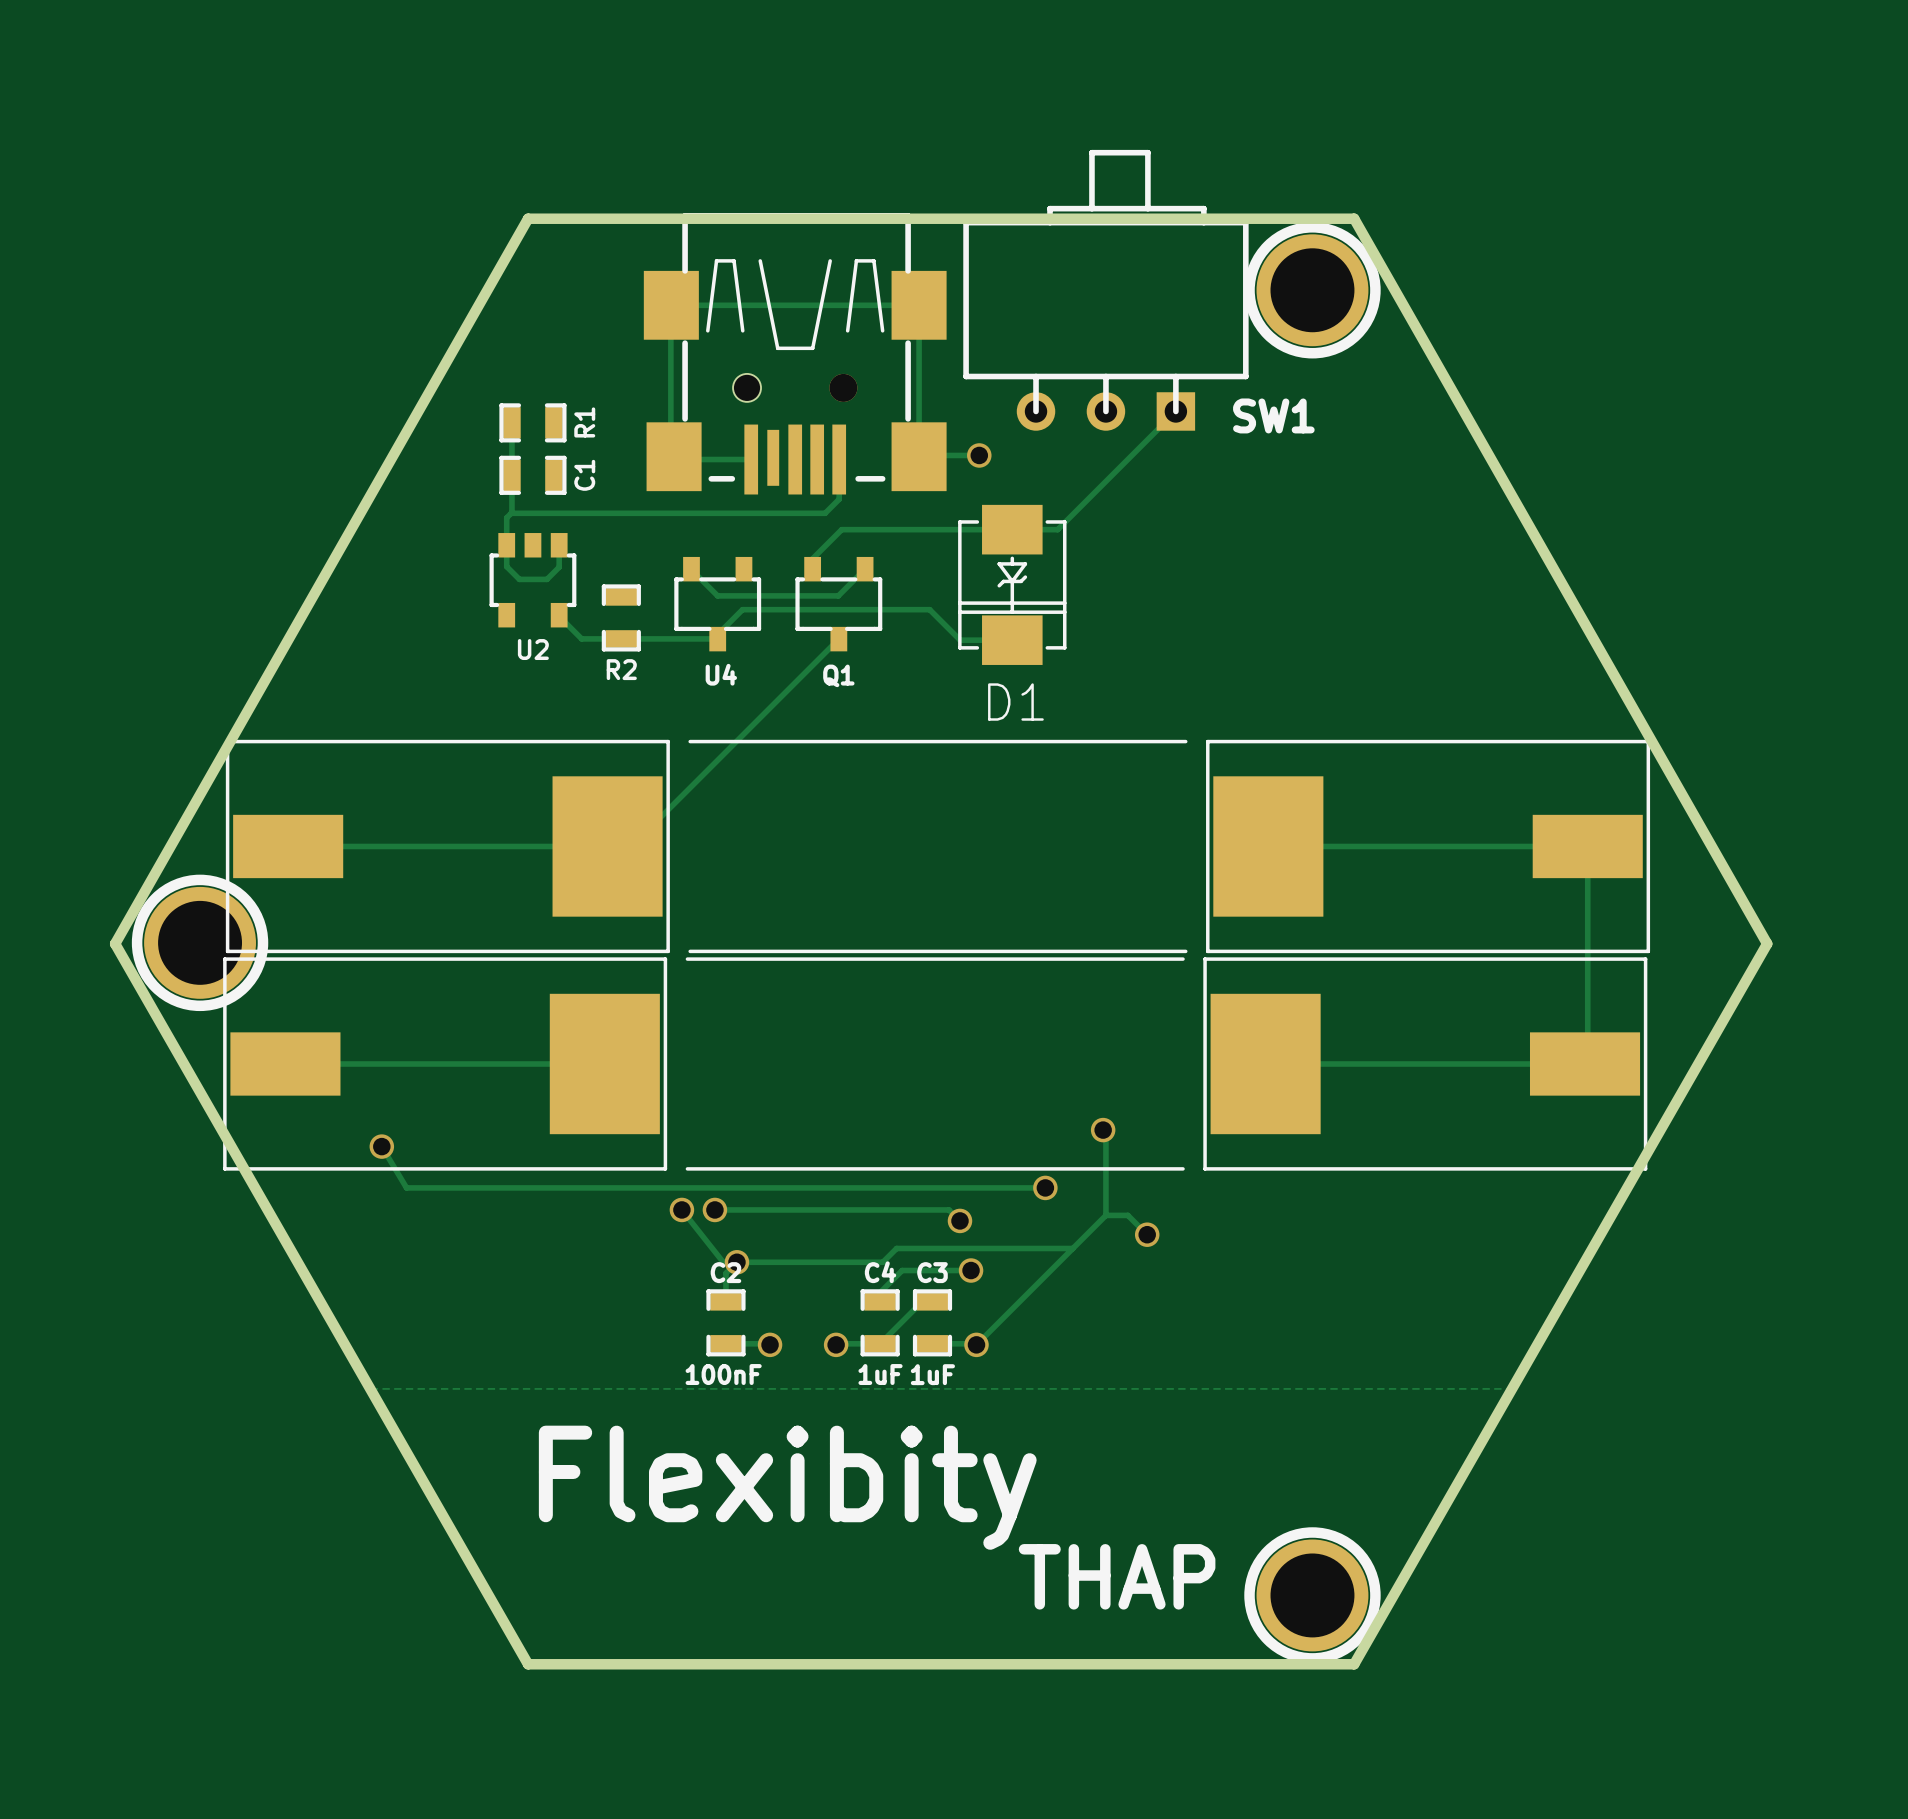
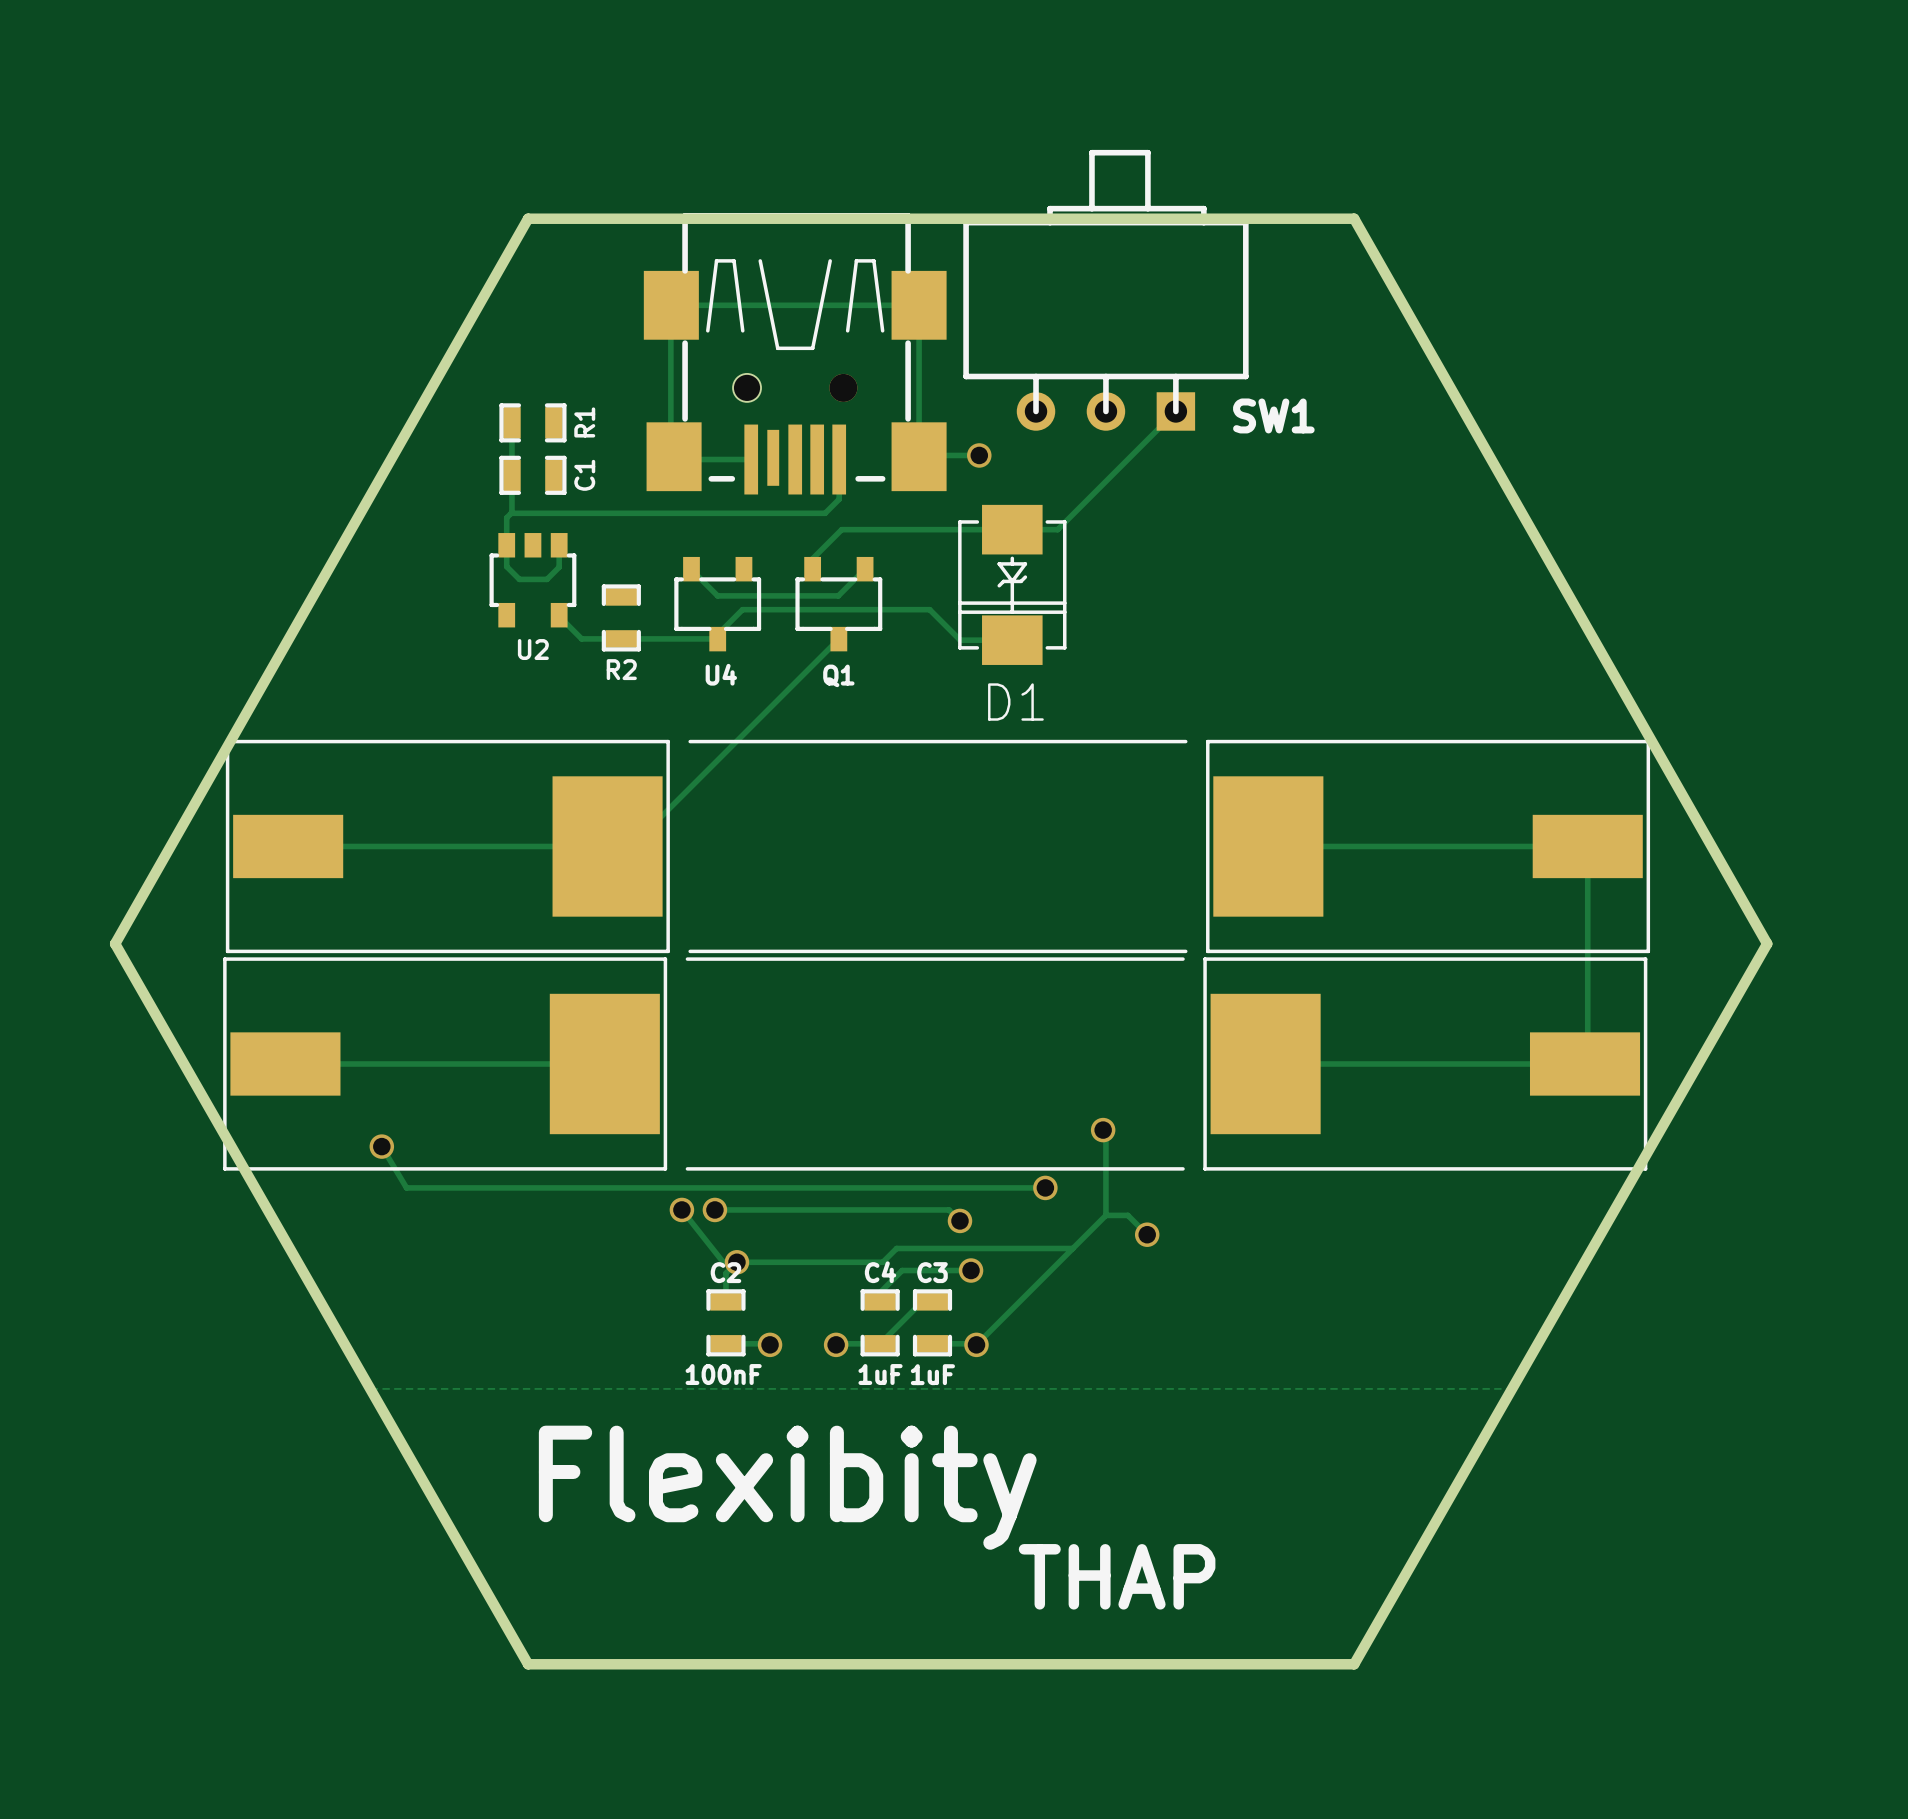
part: (1312, 290) -> none
part: (200, 942) -> none
part: (1312, 1595) -> none

